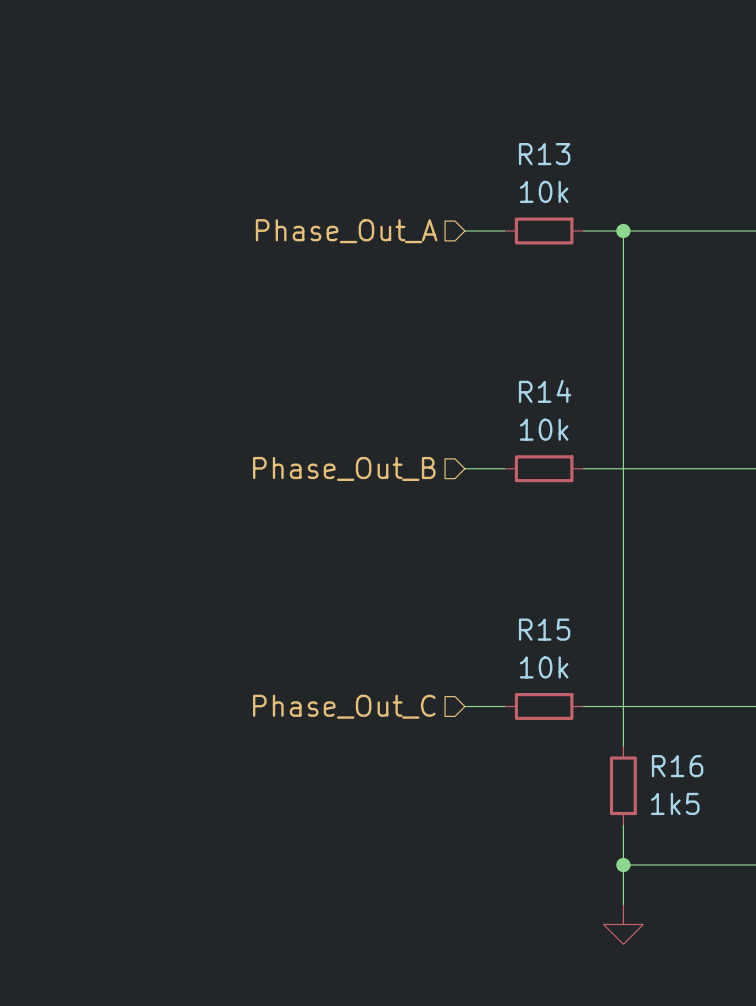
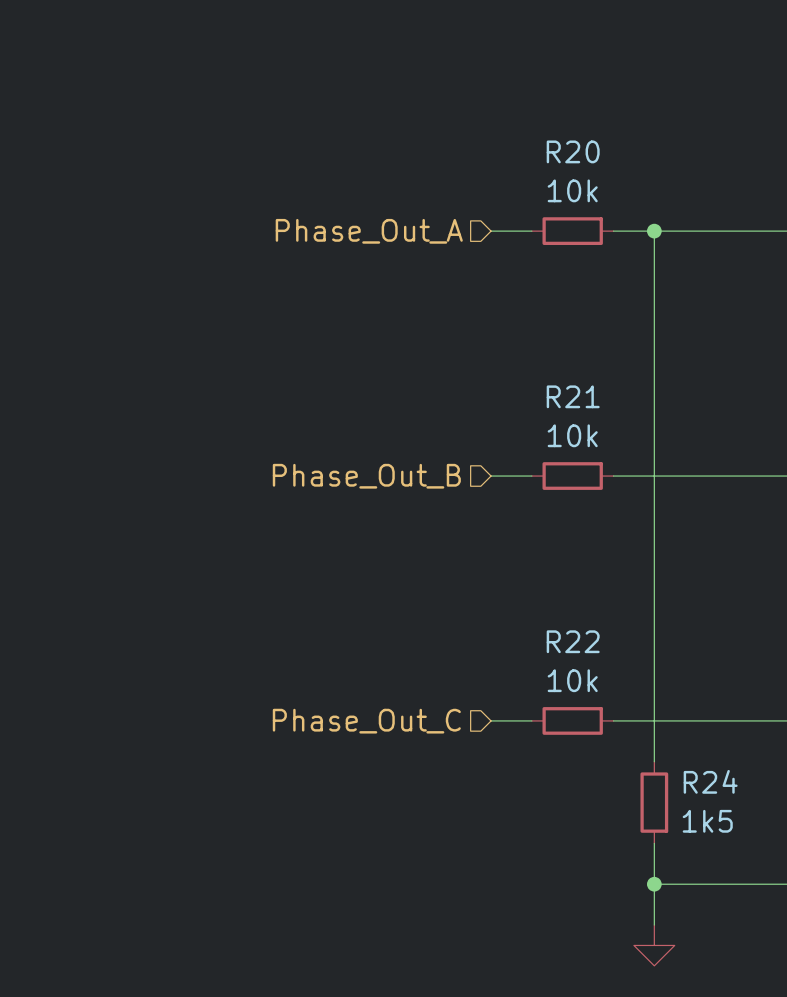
R13 name: R13 (544, 154) -> R20 (573, 151)
R14 name: R14 (545, 391) -> R21 (573, 396)
R15 name: R15 (544, 629) -> R22 (573, 641)
R16 name: R16 (677, 766) -> R24 (710, 781)

